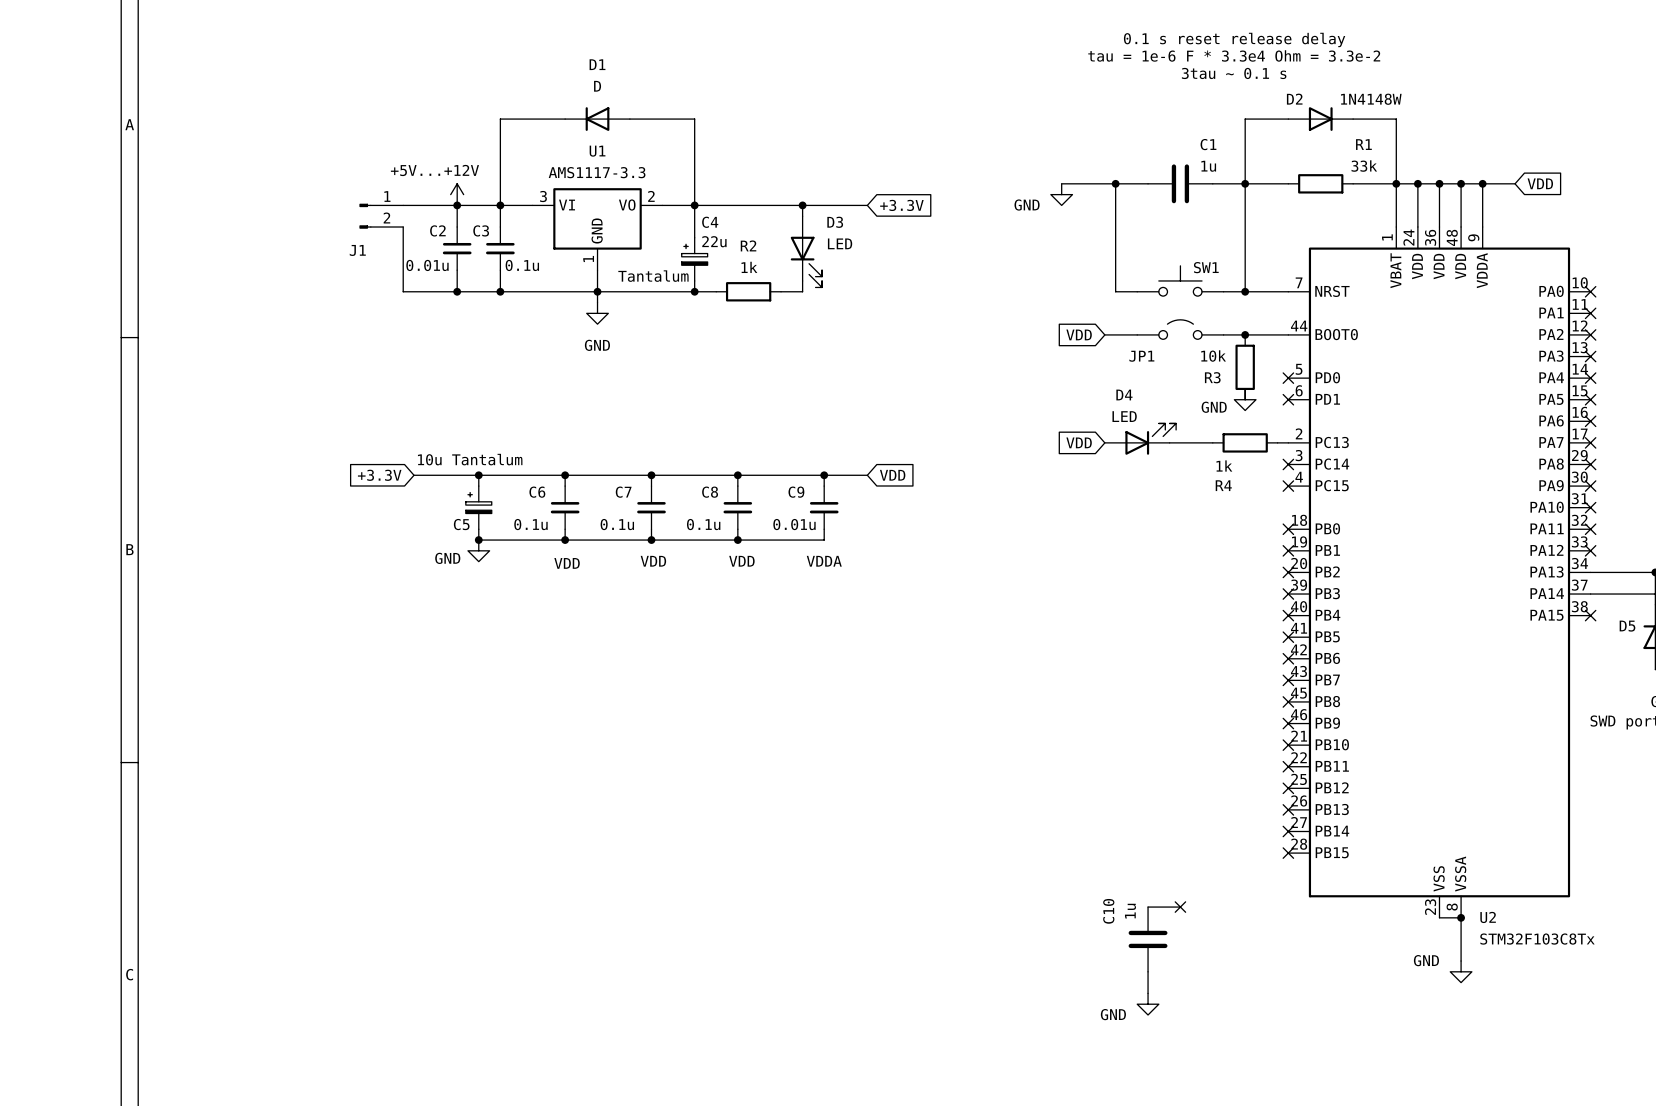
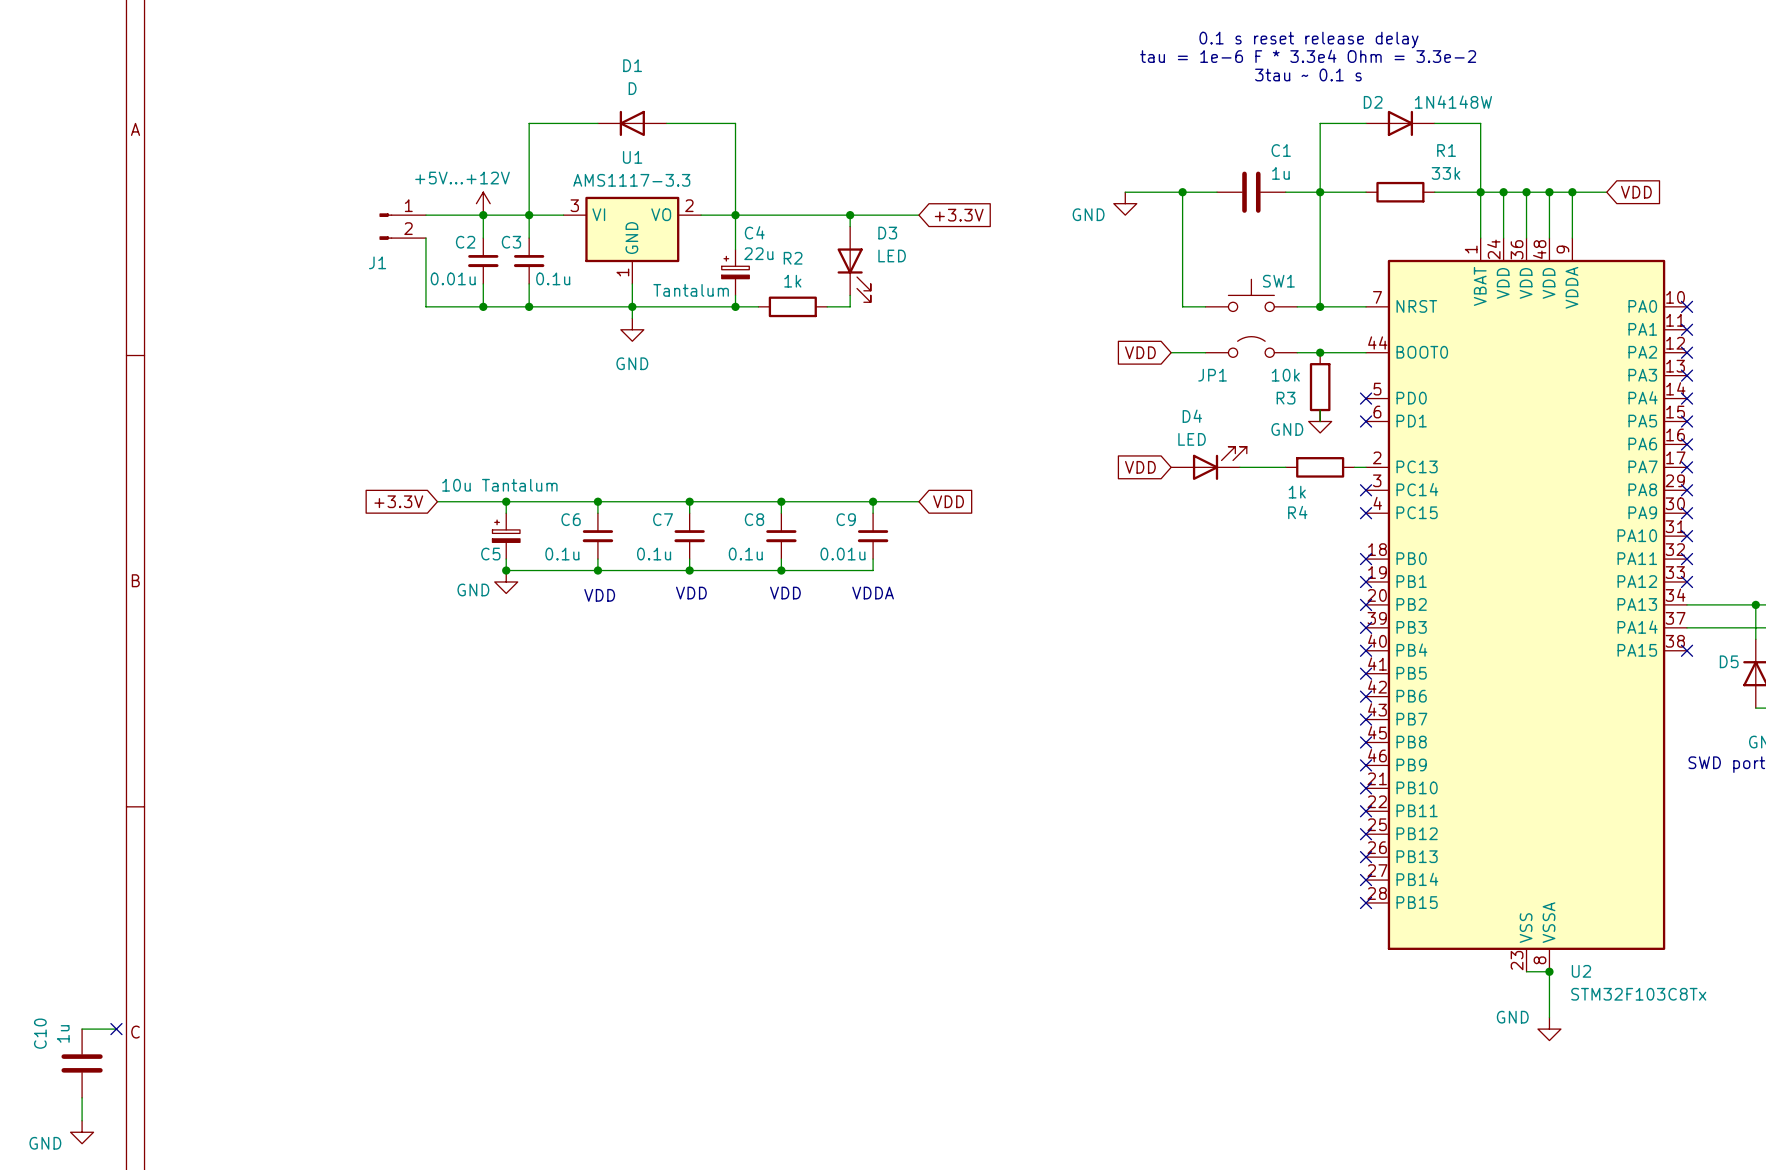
wire: (1148, 907) (1180, 907) -> none
no-connect mark: (1180, 907) -> none
C10 position: (1148, 939) -> (82, 1063)
wire: none -> (82, 1029) (116, 1029)
no-connect mark: none -> (116, 1029)
wire: (1148, 971) (1148, 993) -> none
power symbol: GND (1148, 1004) -> none
wire: none -> (82, 1097) (82, 1120)
power symbol: none -> GND (82, 1132)

